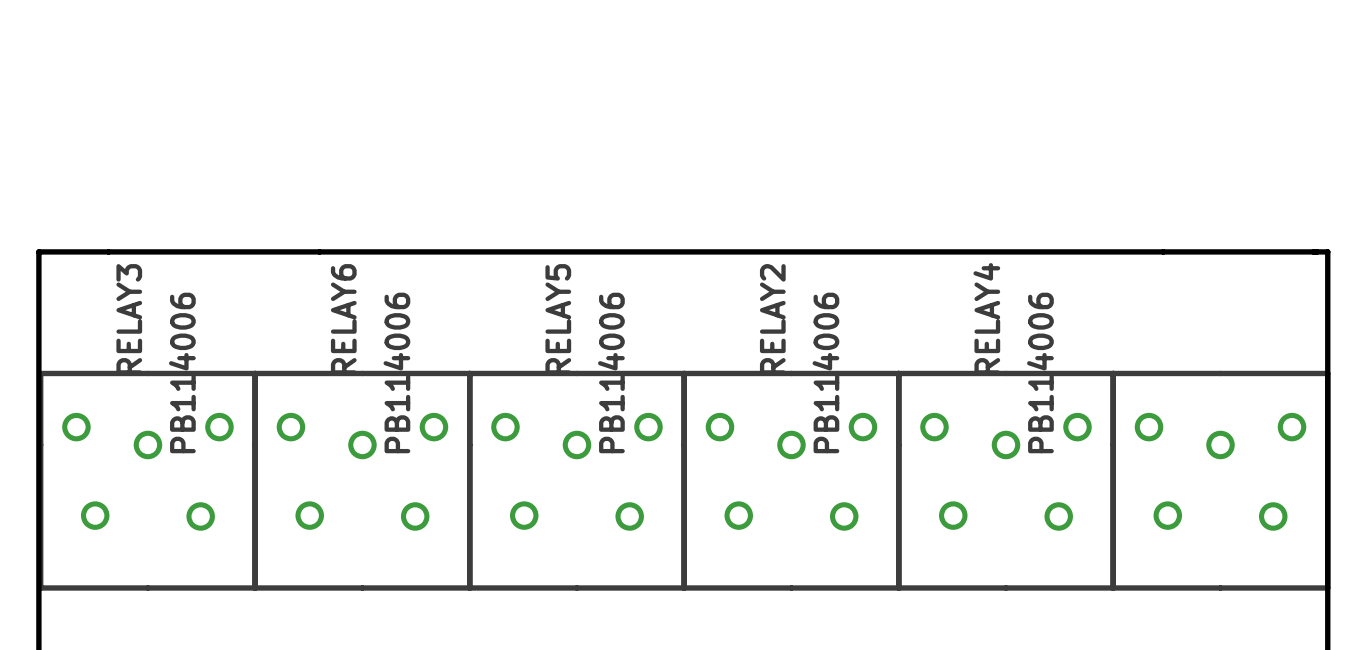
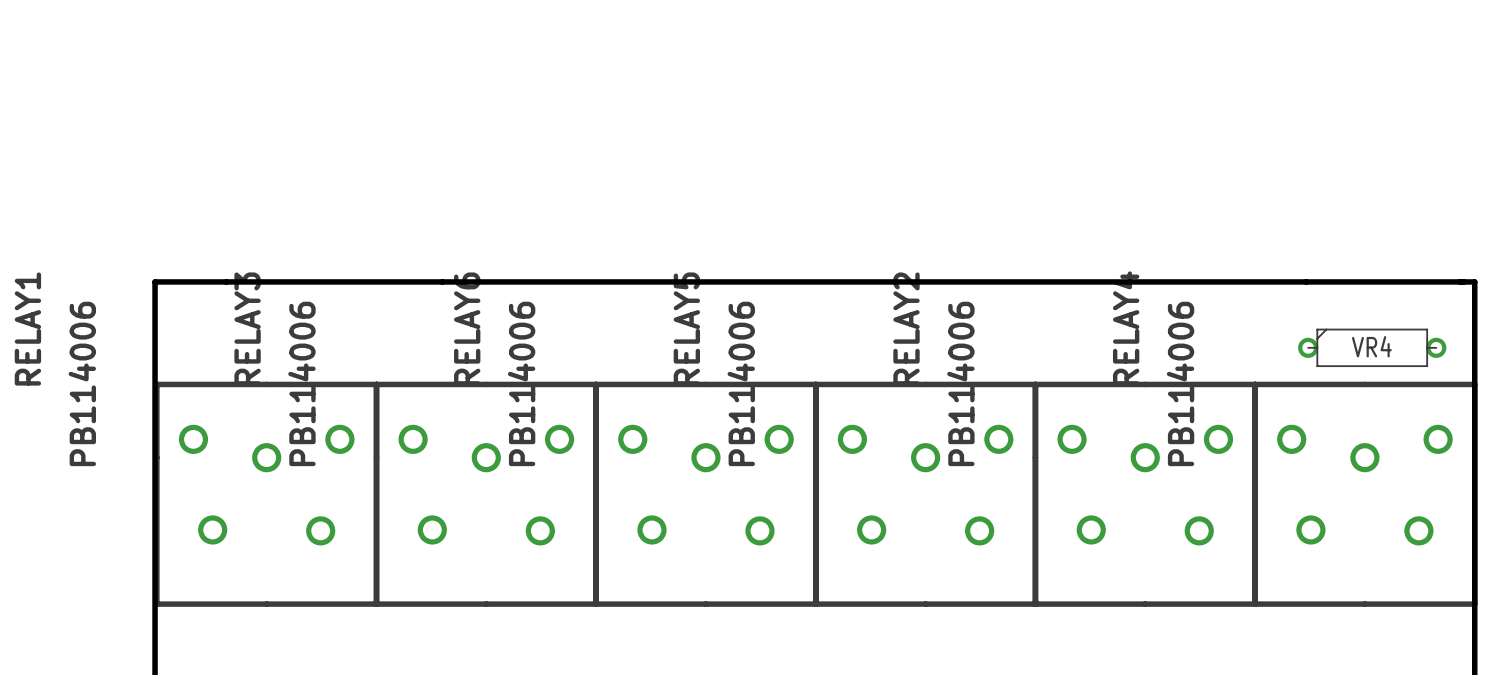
board edge: (38, 273) (38, 251) (1327, 251) (1327, 273) -> (155, 281) (1474, 281)
VR4: none -> (1372, 347)

